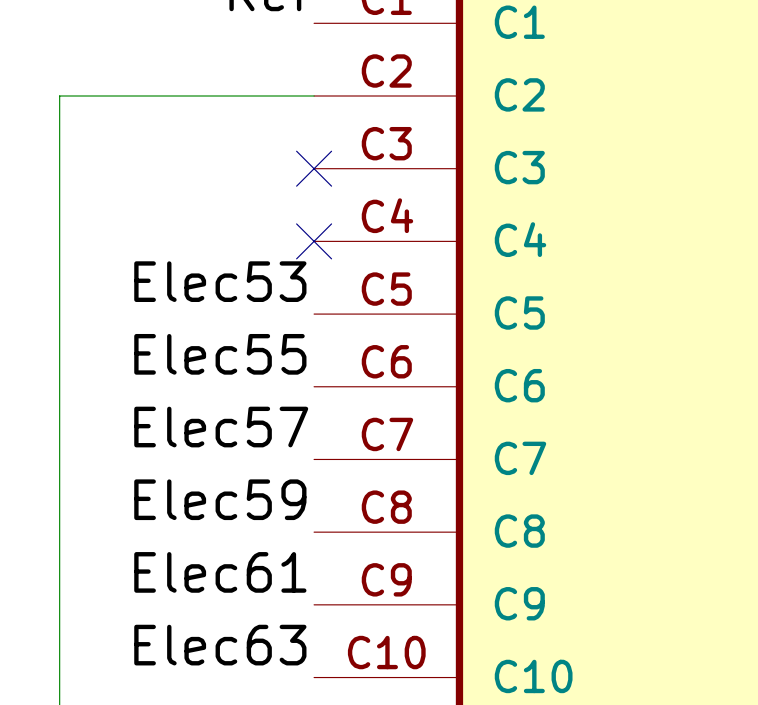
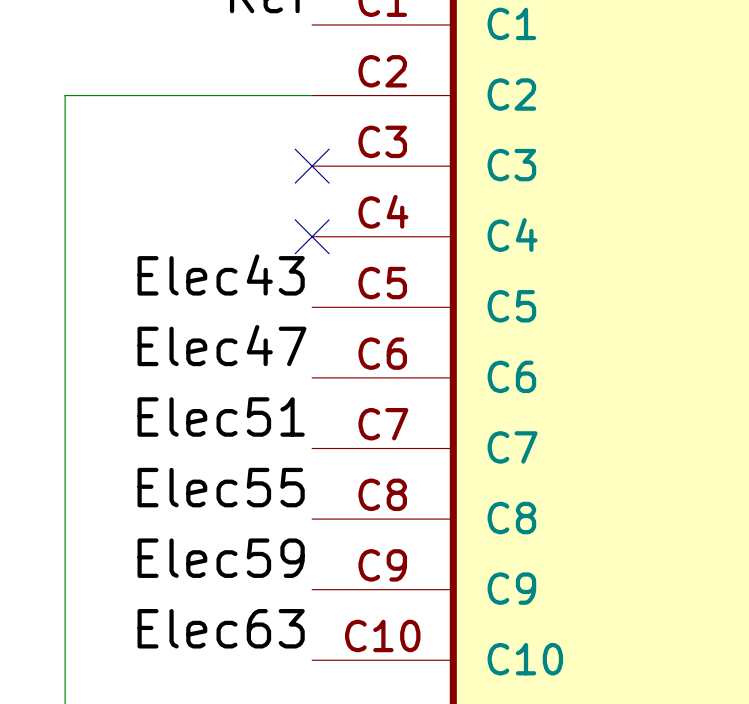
label: Elec53 (220, 281) -> Elec43 (221, 274)
label: Elec55 (220, 354) -> Elec47 (221, 345)
label: Elec57 (221, 427) -> Elec51 (221, 417)
label: Elec59 (220, 499) -> Elec55 (221, 487)
label: Elec61 (220, 572) -> Elec59 (221, 558)

